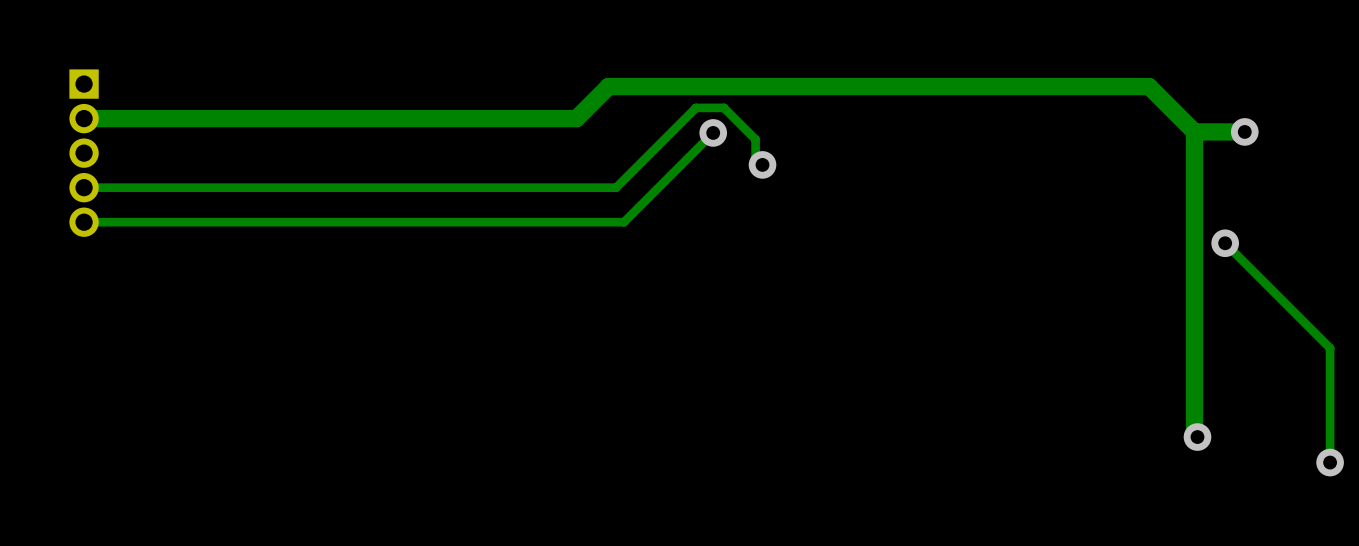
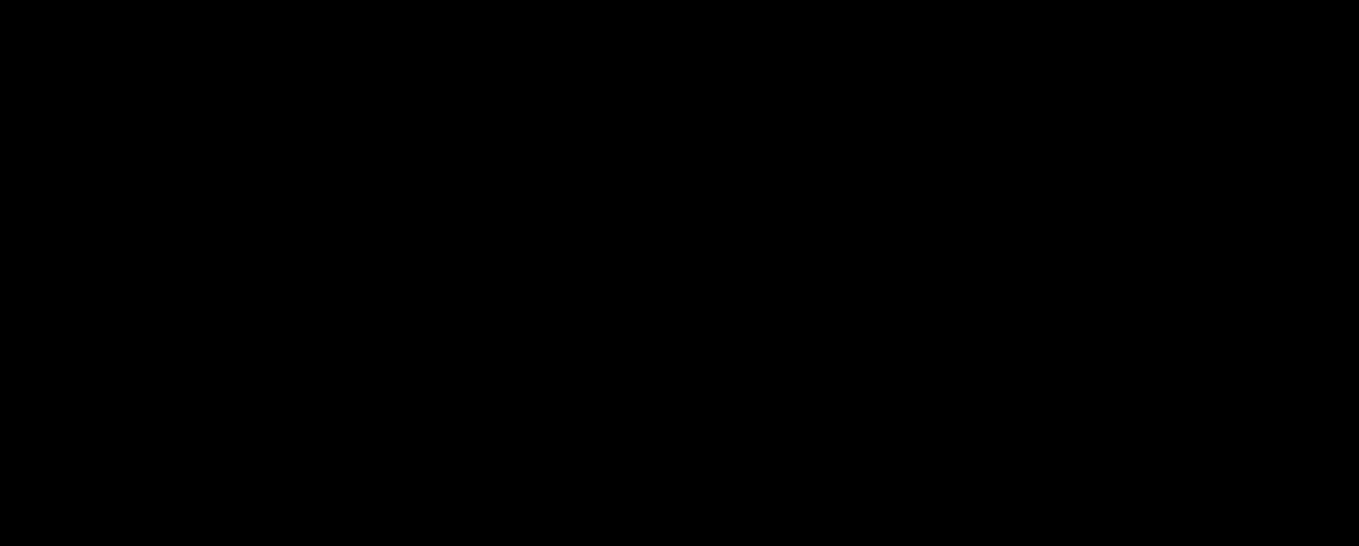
track: (84, 118) (576, 118) (608, 86) (1149, 86) (1194, 131) -> none
track: (1194, 131) (1194, 434) (1197, 437) -> none
track: (1244, 131) (1194, 131) -> none
via: (1244, 131) -> none
track: (713, 132) (623, 222) (84, 222) -> none
via: (713, 132) -> none
part: (84, 153) -> none
track: (755, 158) (755, 139) (723, 107) (695, 107) (616, 187) (84, 187) -> none
via: (762, 164) -> none
track: (1225, 243) (1330, 348) (1330, 462) -> none
via: (1225, 243) -> none
via: (1197, 437) -> none
via: (1330, 462) -> none

